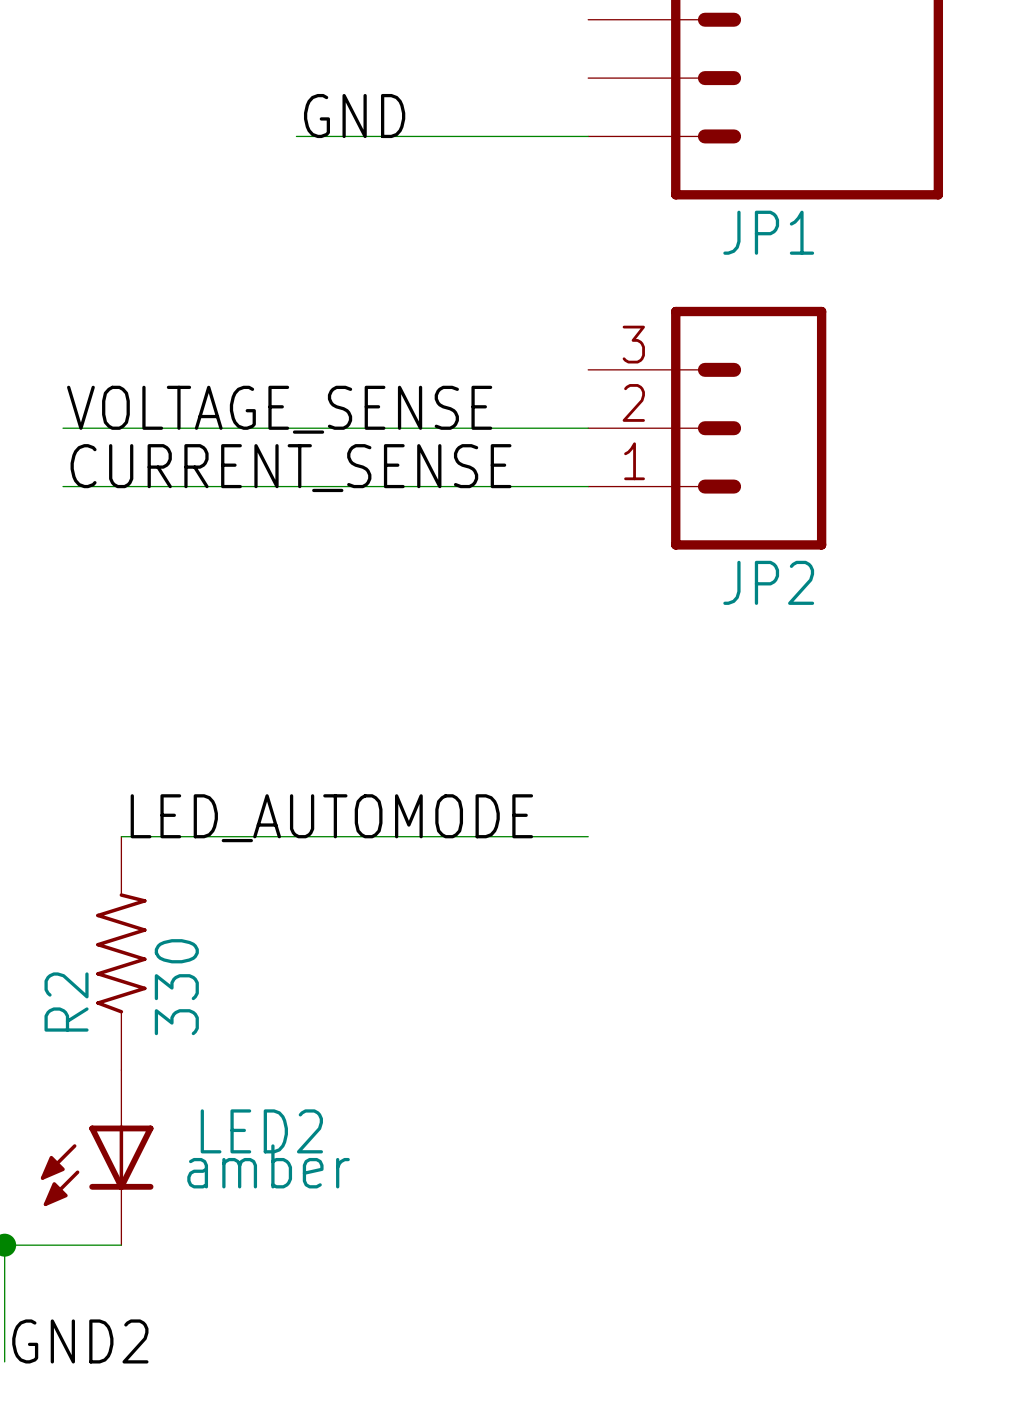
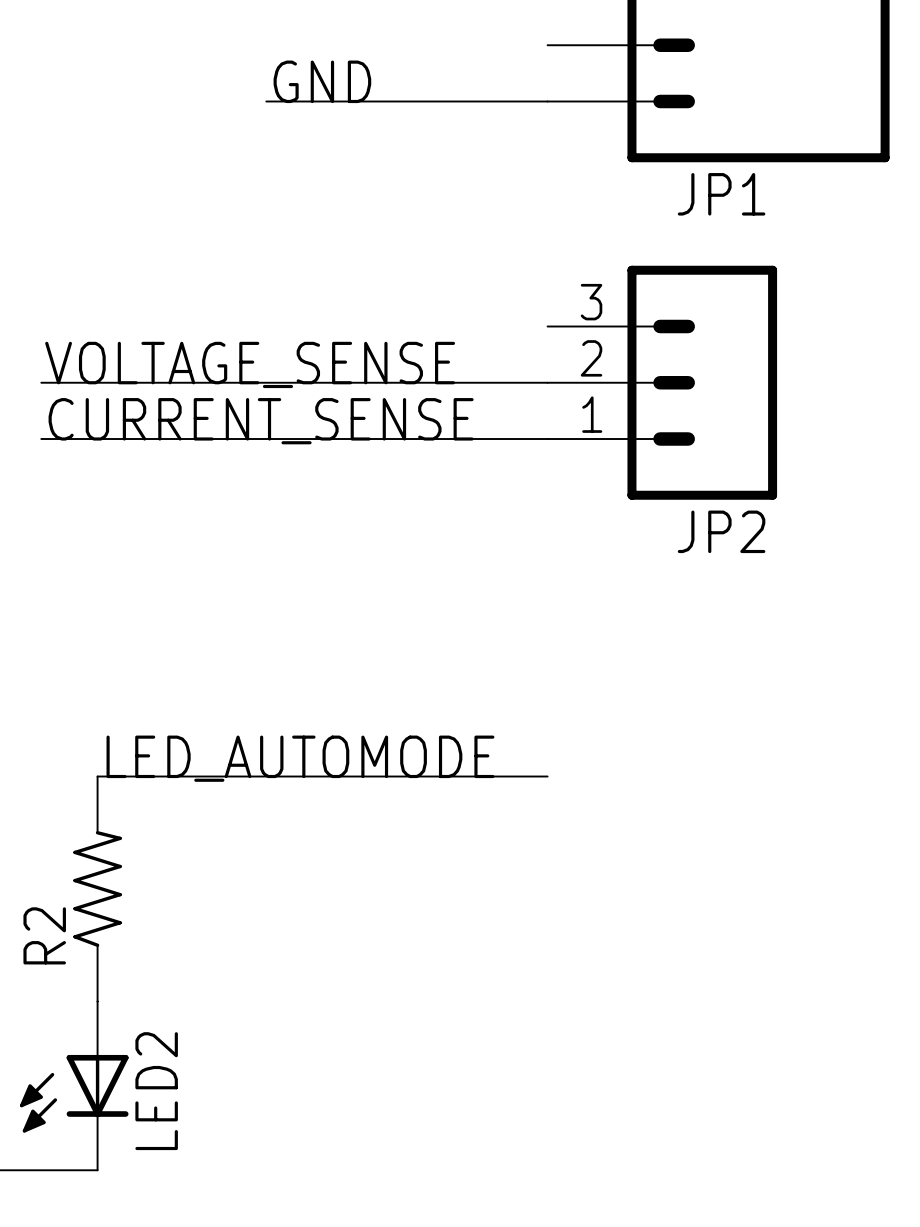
R2 value: 330 (176, 987) -> none
LED2 name rotation: 0° (261, 1131) -> 90° counterclockwise (156, 1091)
LED2 text: amber (268, 1166) -> none

